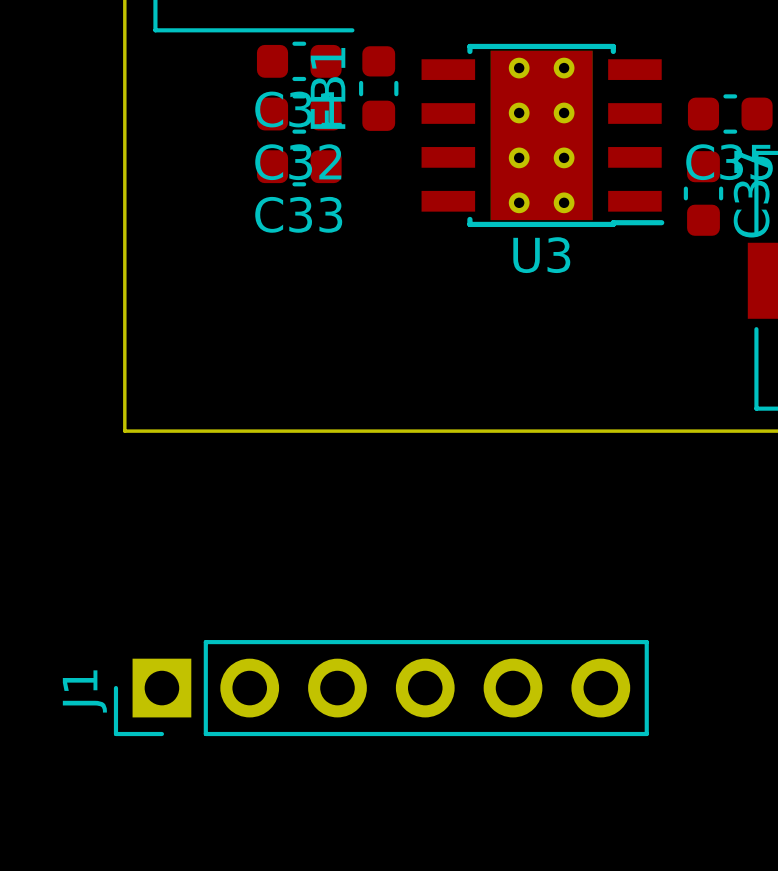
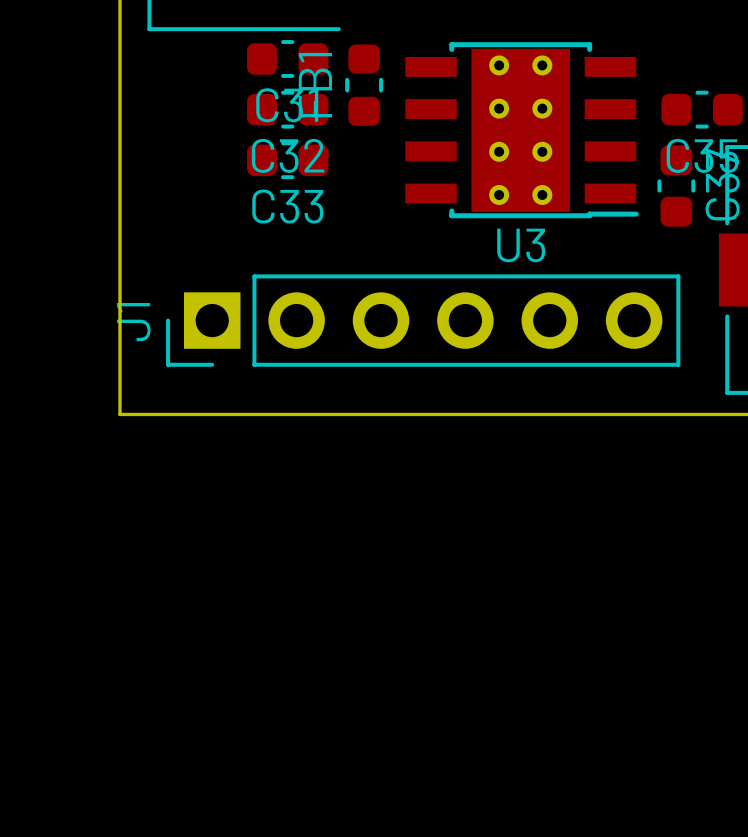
J1 position: (381, 688) -> (423, 320)

